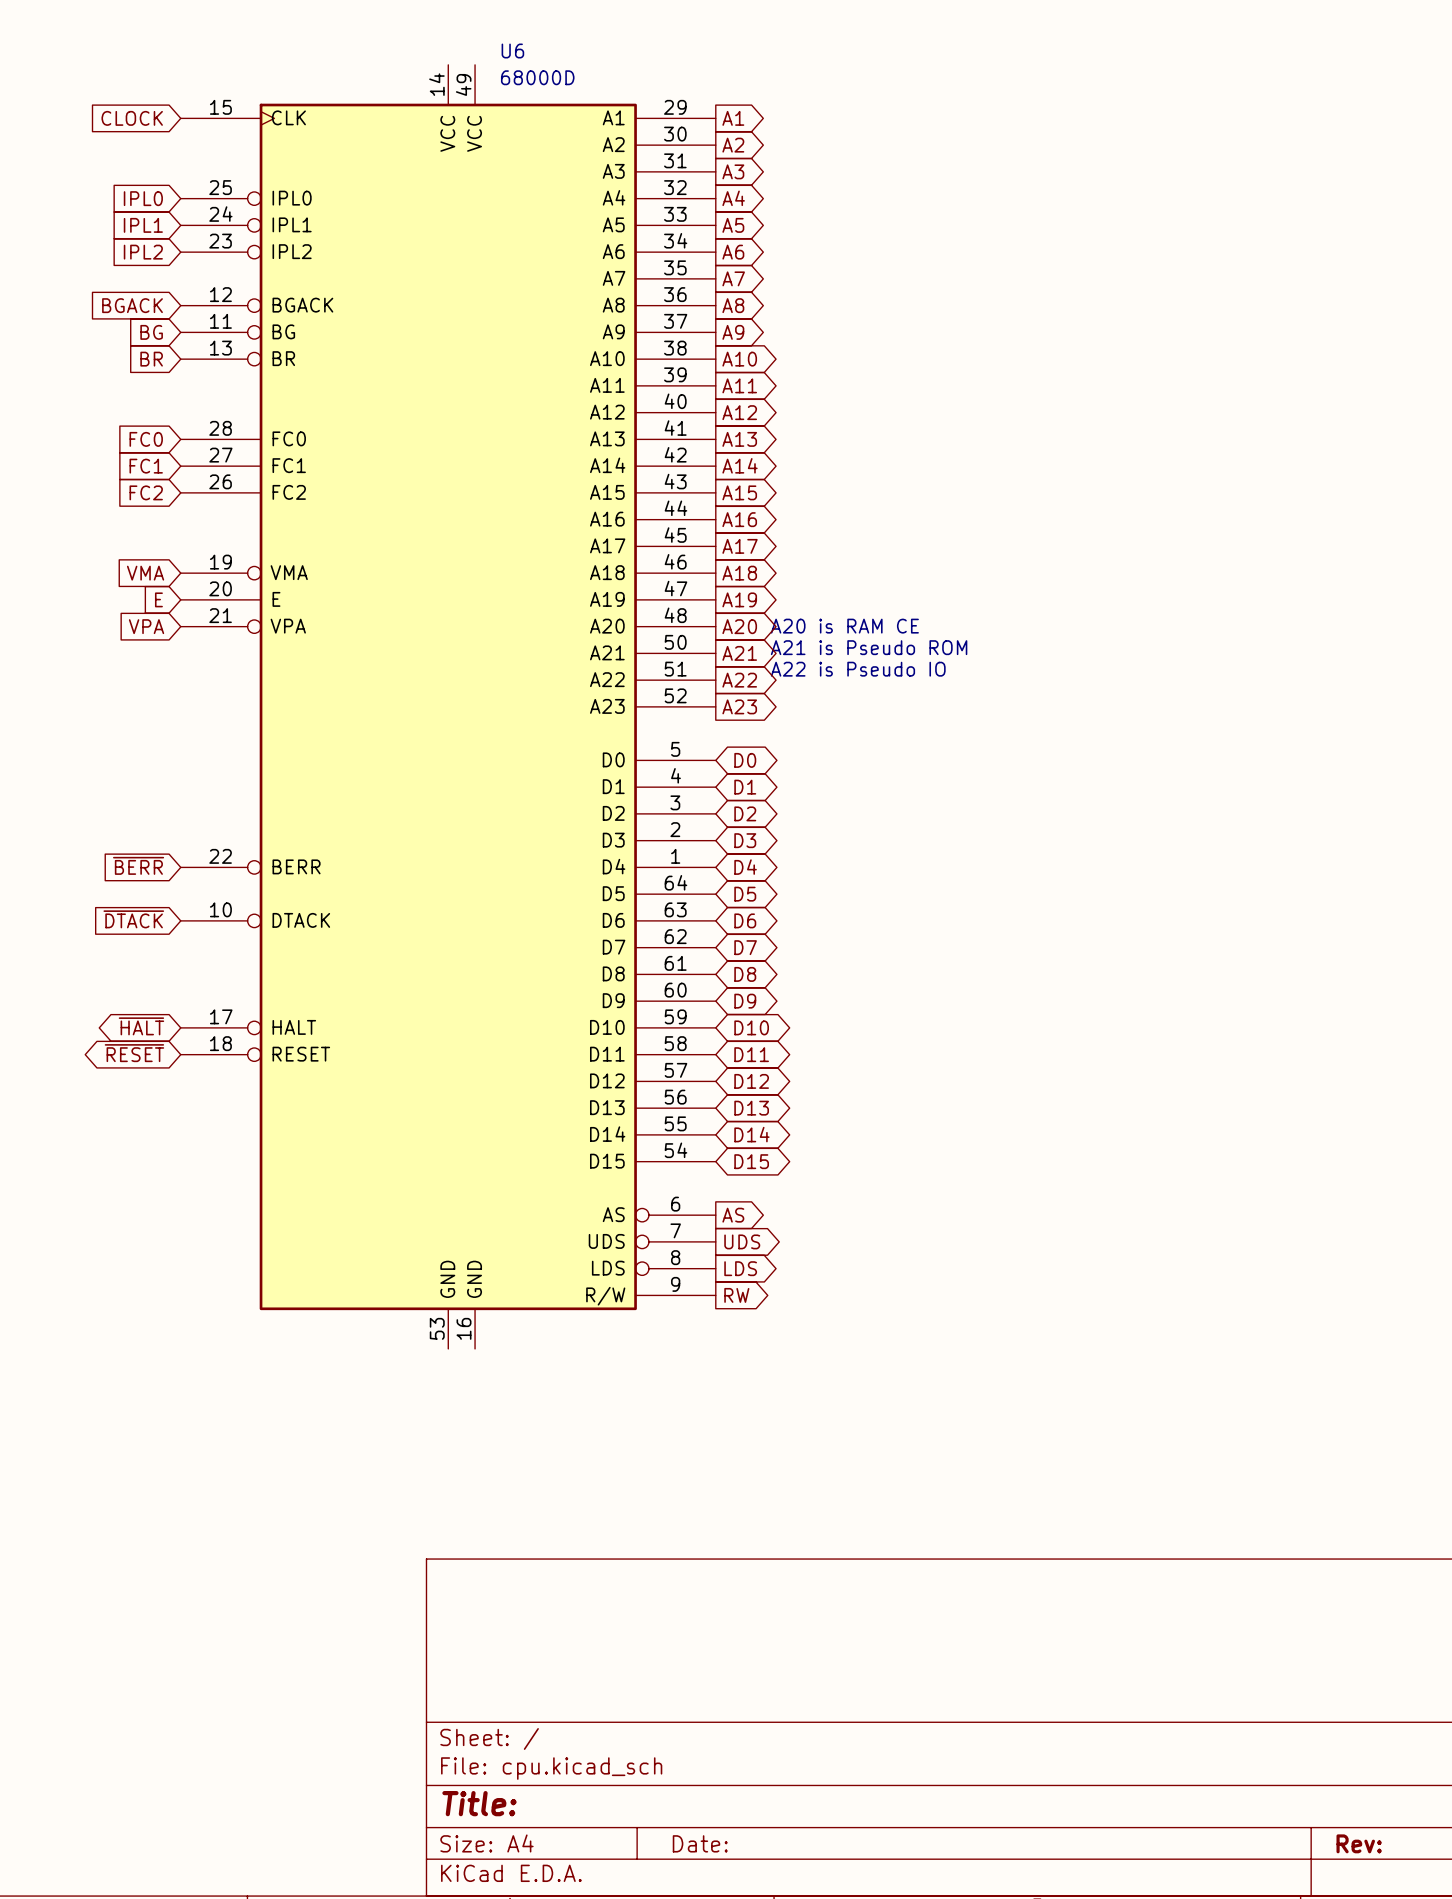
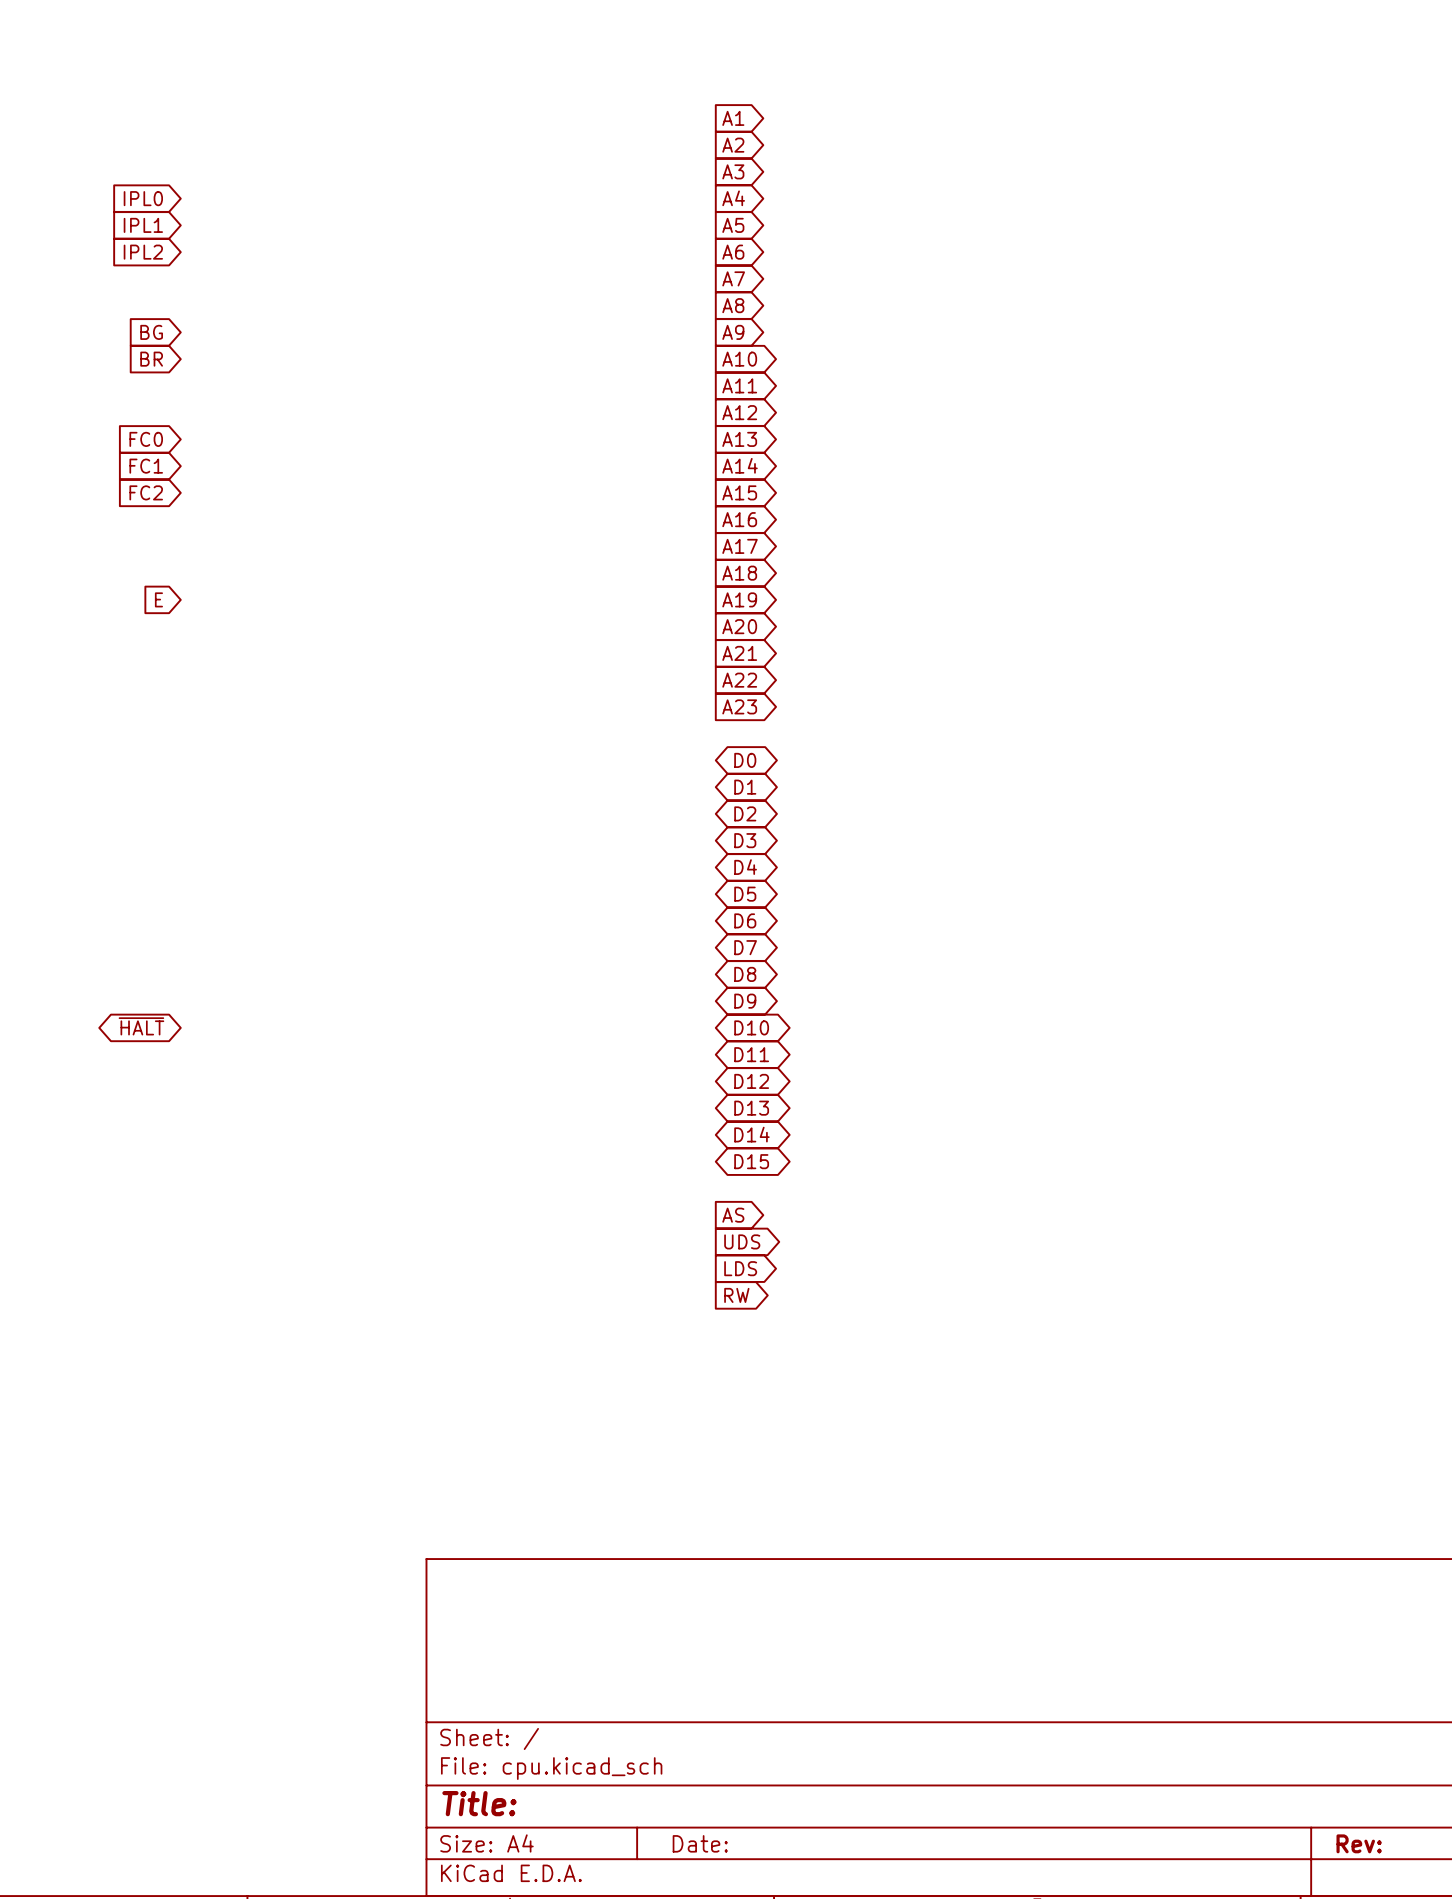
global label: CLOCK (132, 118) -> none
global label: BGACK (132, 305) -> none
global label: VMA (145, 573) -> none
global label: VPA (146, 626) -> none
text: A20 is RAM CE (844, 626) -> none
text: A21 is Pseudo ROM (869, 647) -> none
text: A22 is Pseudo IO (858, 669) -> none
U6: 68000D (448, 706) -> none
global label: ~{BERR} (138, 865) -> none
global label: ~{DTACK} (133, 919) -> none
global label: ~{RESET} (134, 1053) -> none

